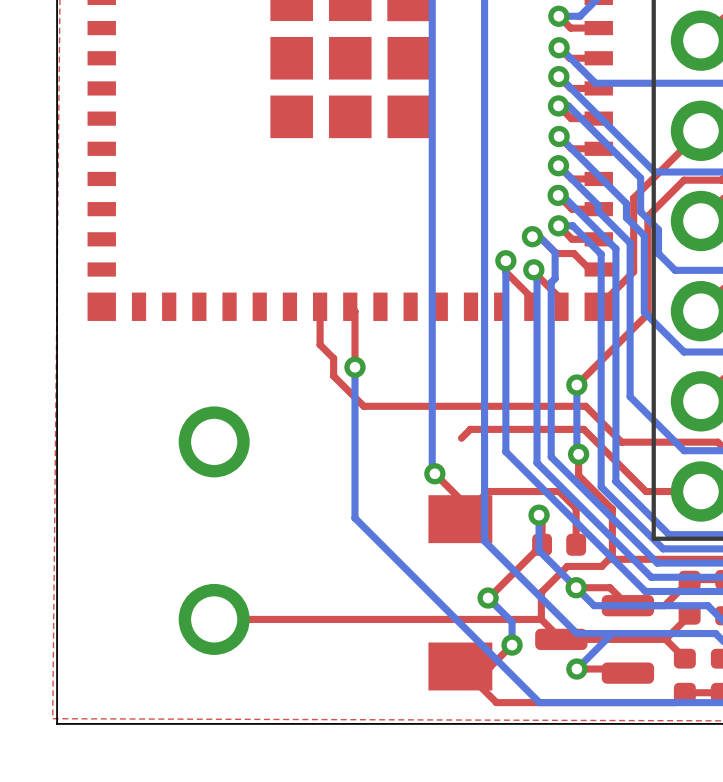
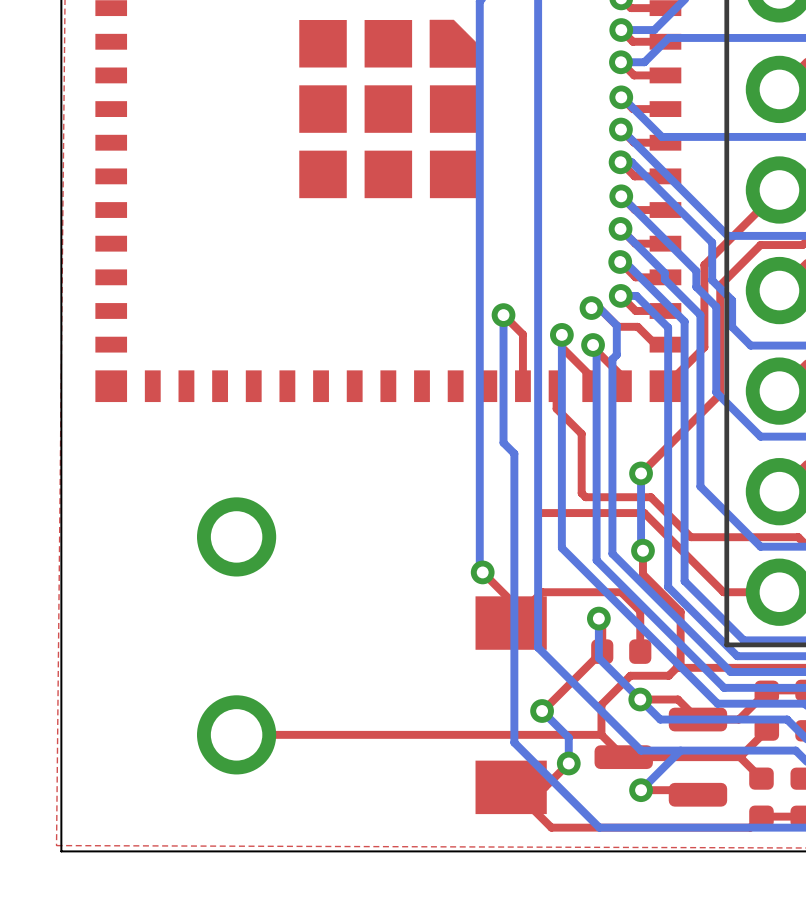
top track: none -> (503, 315) (522, 334) (522, 386)
top track: (320, 306) (320, 344) (333, 358) (333, 376) (363, 406) (527, 406) -> (556, 386) (556, 408) (581, 433) (581, 493) (585, 497)
top track: (350, 306) (354, 311) (354, 367) -> none
bottom track: (354, 367) (354, 518) (463, 626) -> (503, 315) (503, 442) (514, 453) (514, 742)
via position: (354, 367) -> (503, 315)
top track: (461, 438) (470, 429) (583, 429) (646, 491) (650, 491) -> (542, 513) (644, 513) (723, 592)

